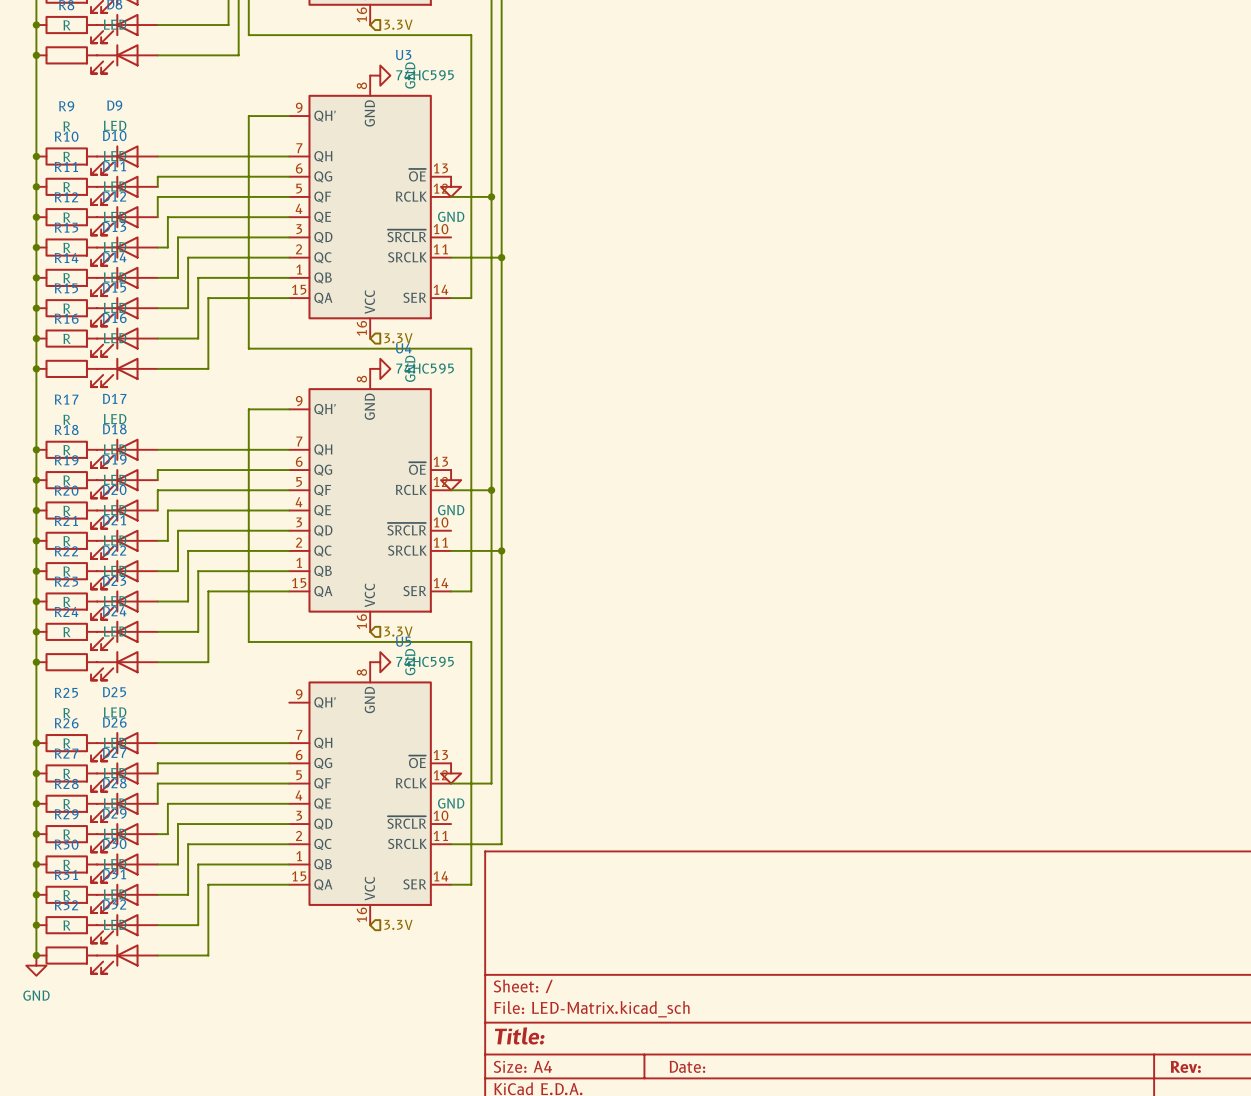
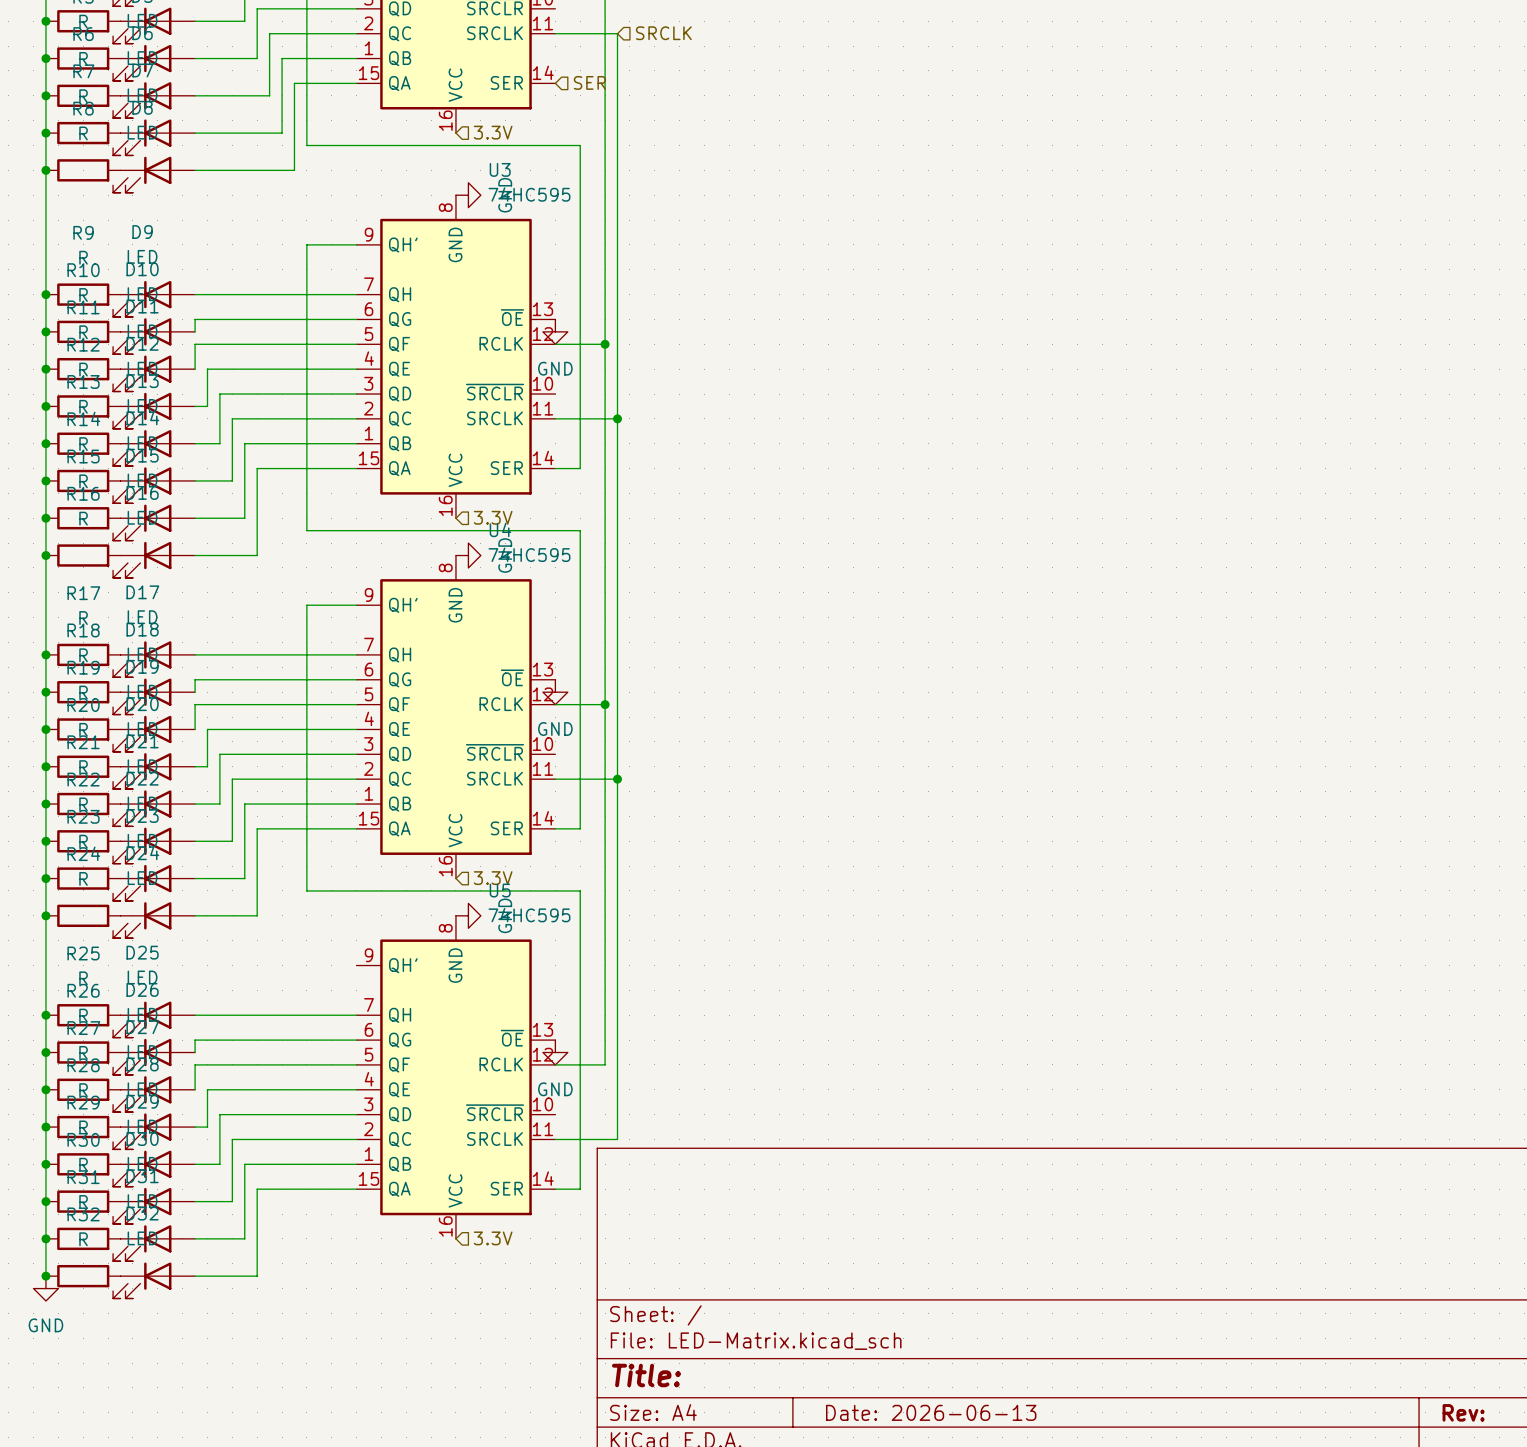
title block: Date: (687, 1066) -> Date: 2026-06-13 (931, 1412)

